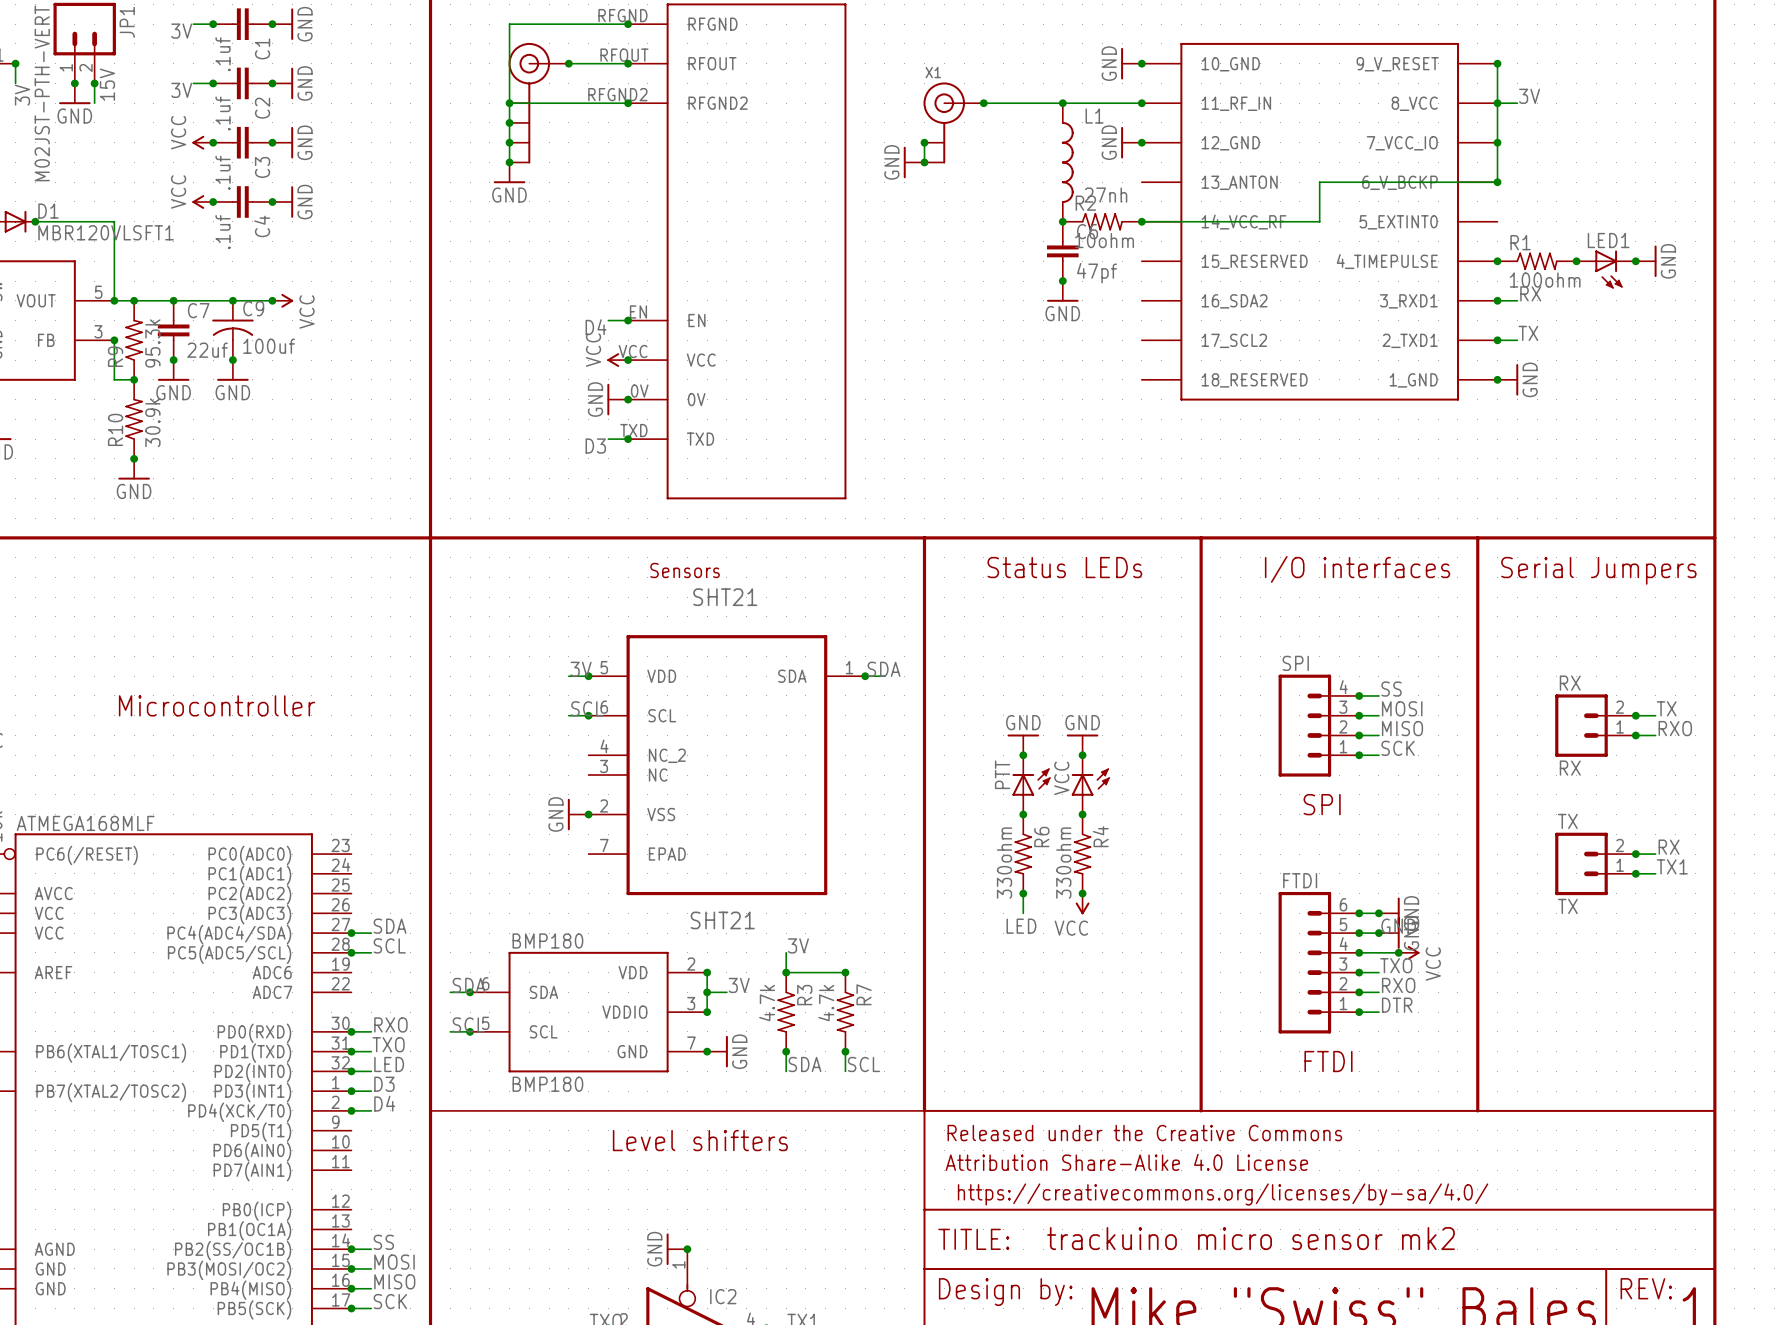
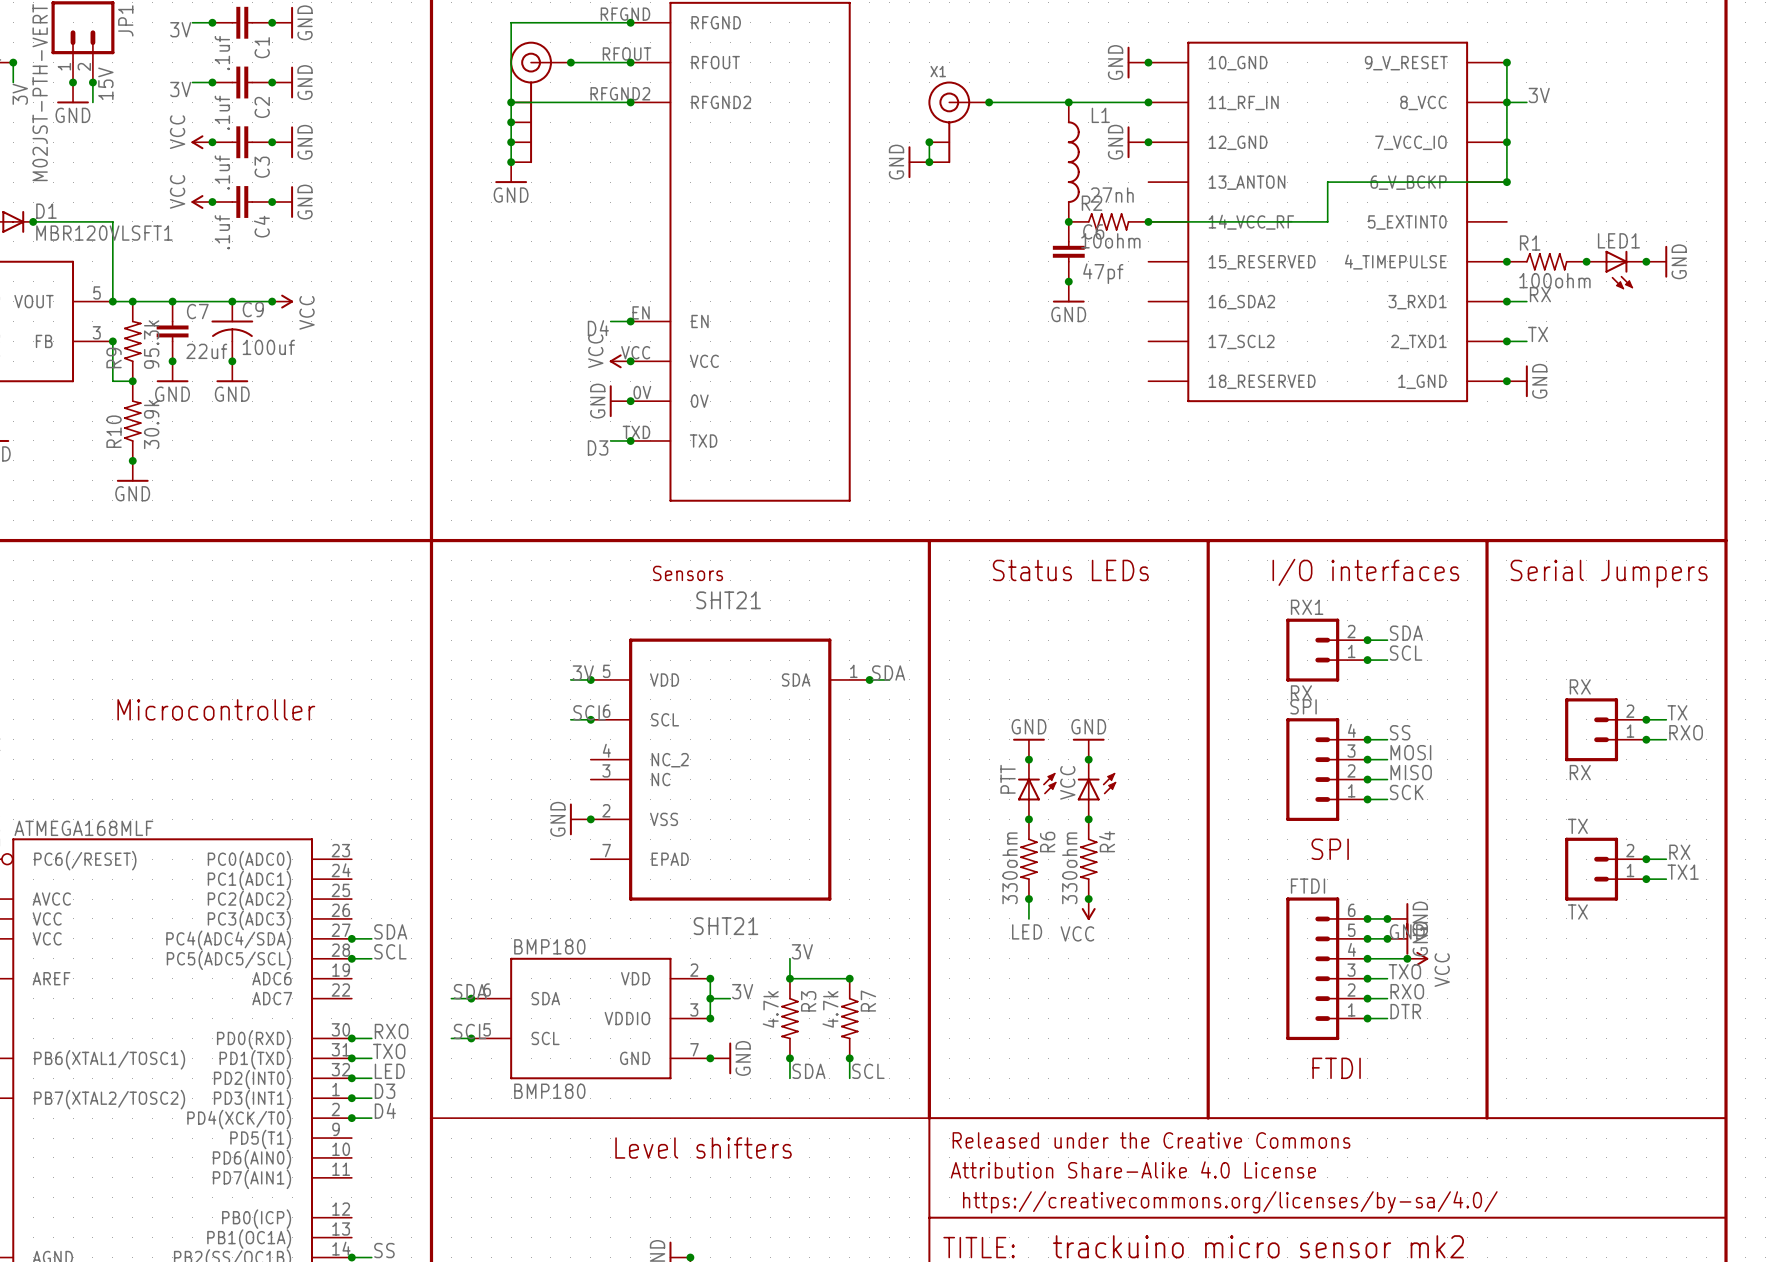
label: none -> SDA (1406, 633)
junction: none -> (1367, 640)
RX1: none -> RX (1326, 650)
label: none -> SCL (1406, 653)
junction: none -> (1367, 660)
label: SS (1391, 689) -> none
wire: (1359, 695) (1378, 695) -> (1367, 640) (1387, 640)
junction: (1359, 695) -> none
label: MOSI (1402, 708) -> none
wire: (1359, 715) (1378, 715) -> (1367, 660) (1387, 660)
junction: (1359, 715) -> none
SPI position: (1318, 725) -> (1326, 769)
label: MISO (1402, 728) -> SS (1400, 732)
label: SCK (1398, 748) -> MOSI (1410, 752)
label: none -> MISO (1411, 772)
wire: none -> (1367, 779) (1387, 779)
junction: none -> (1367, 779)
label: none -> SCK (1406, 792)
wire: none -> (1367, 799) (1387, 799)
junction: none -> (1367, 799)
text position: SPI (1322, 804) -> SPI (1330, 849)

